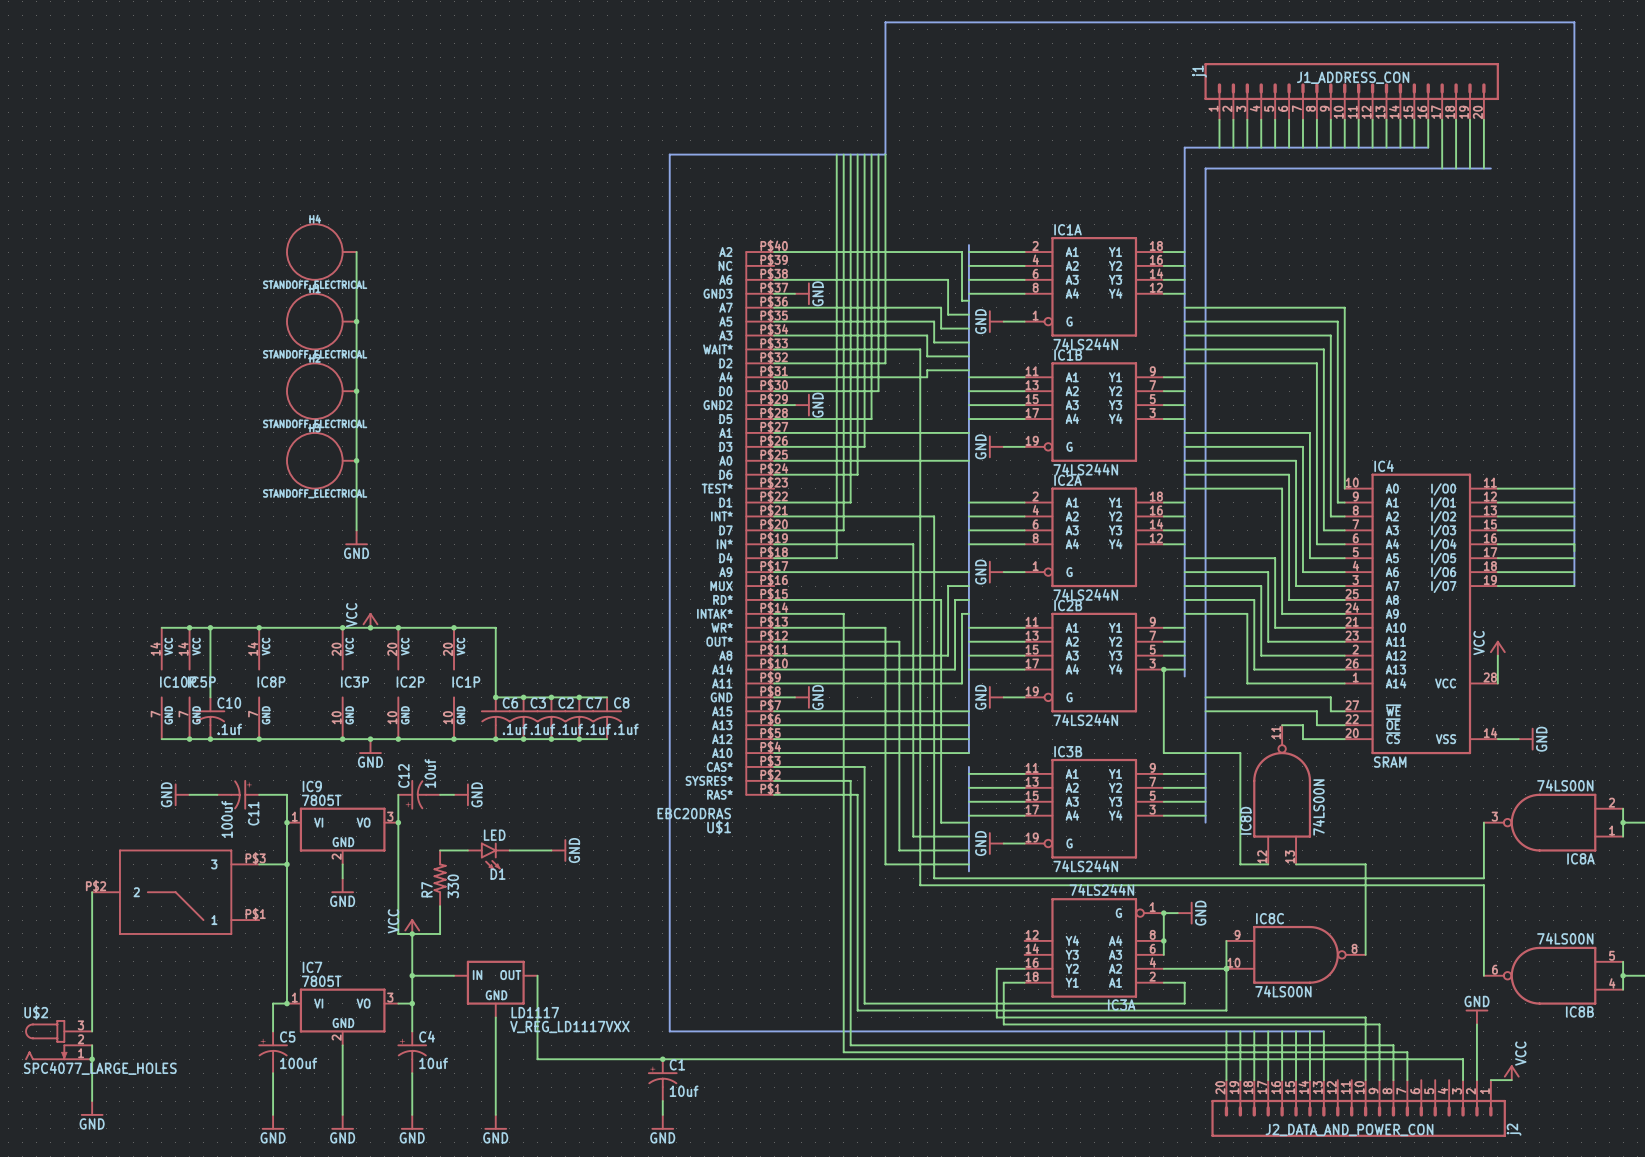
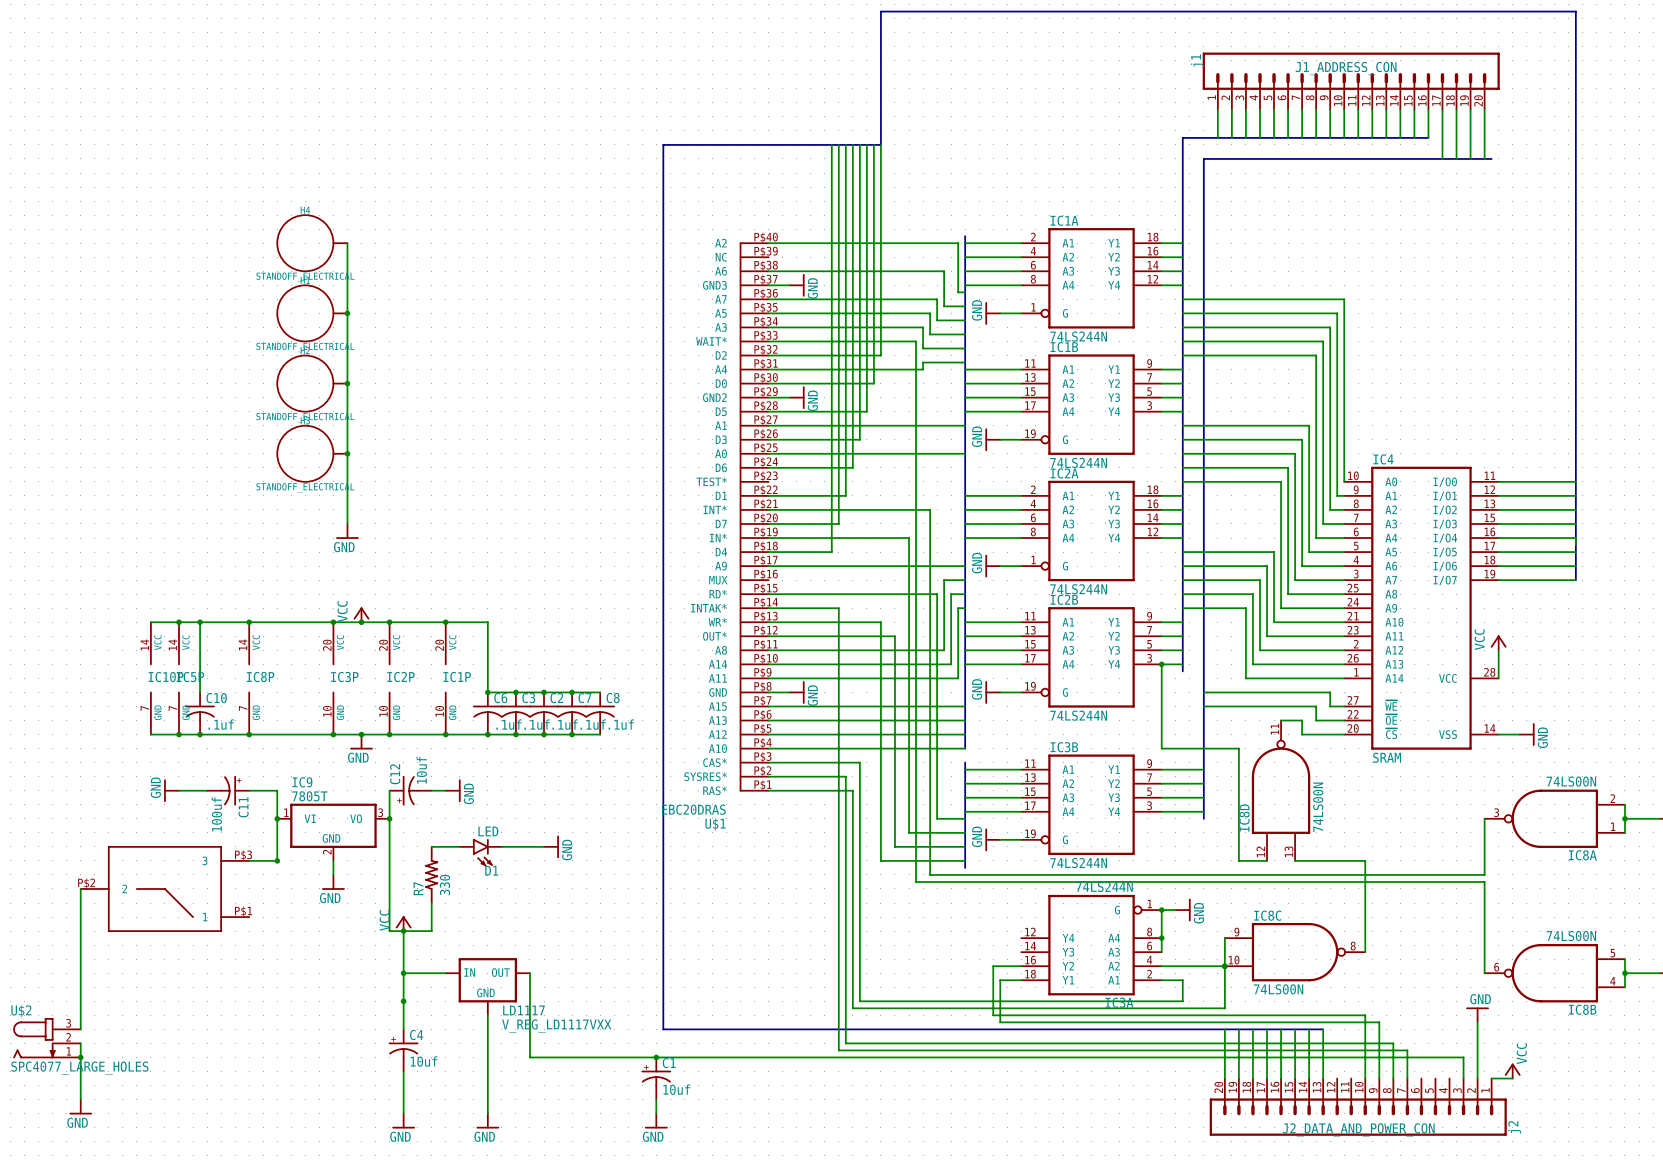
wire: (286, 864) (286, 1003) (273, 1003) (273, 1031) -> none
junction: (286, 1003) -> none
wire: (398, 1003) (412, 1003) -> none
IC7: 7805T (342, 1016) -> none
wire: (342, 1045) (342, 1114) -> none
C5: 100uf (273, 1052) -> none
wire: (273, 1073) (273, 1114) -> none
power symbol: GND (273, 1122) -> none
power symbol: GND (342, 1122) -> none

